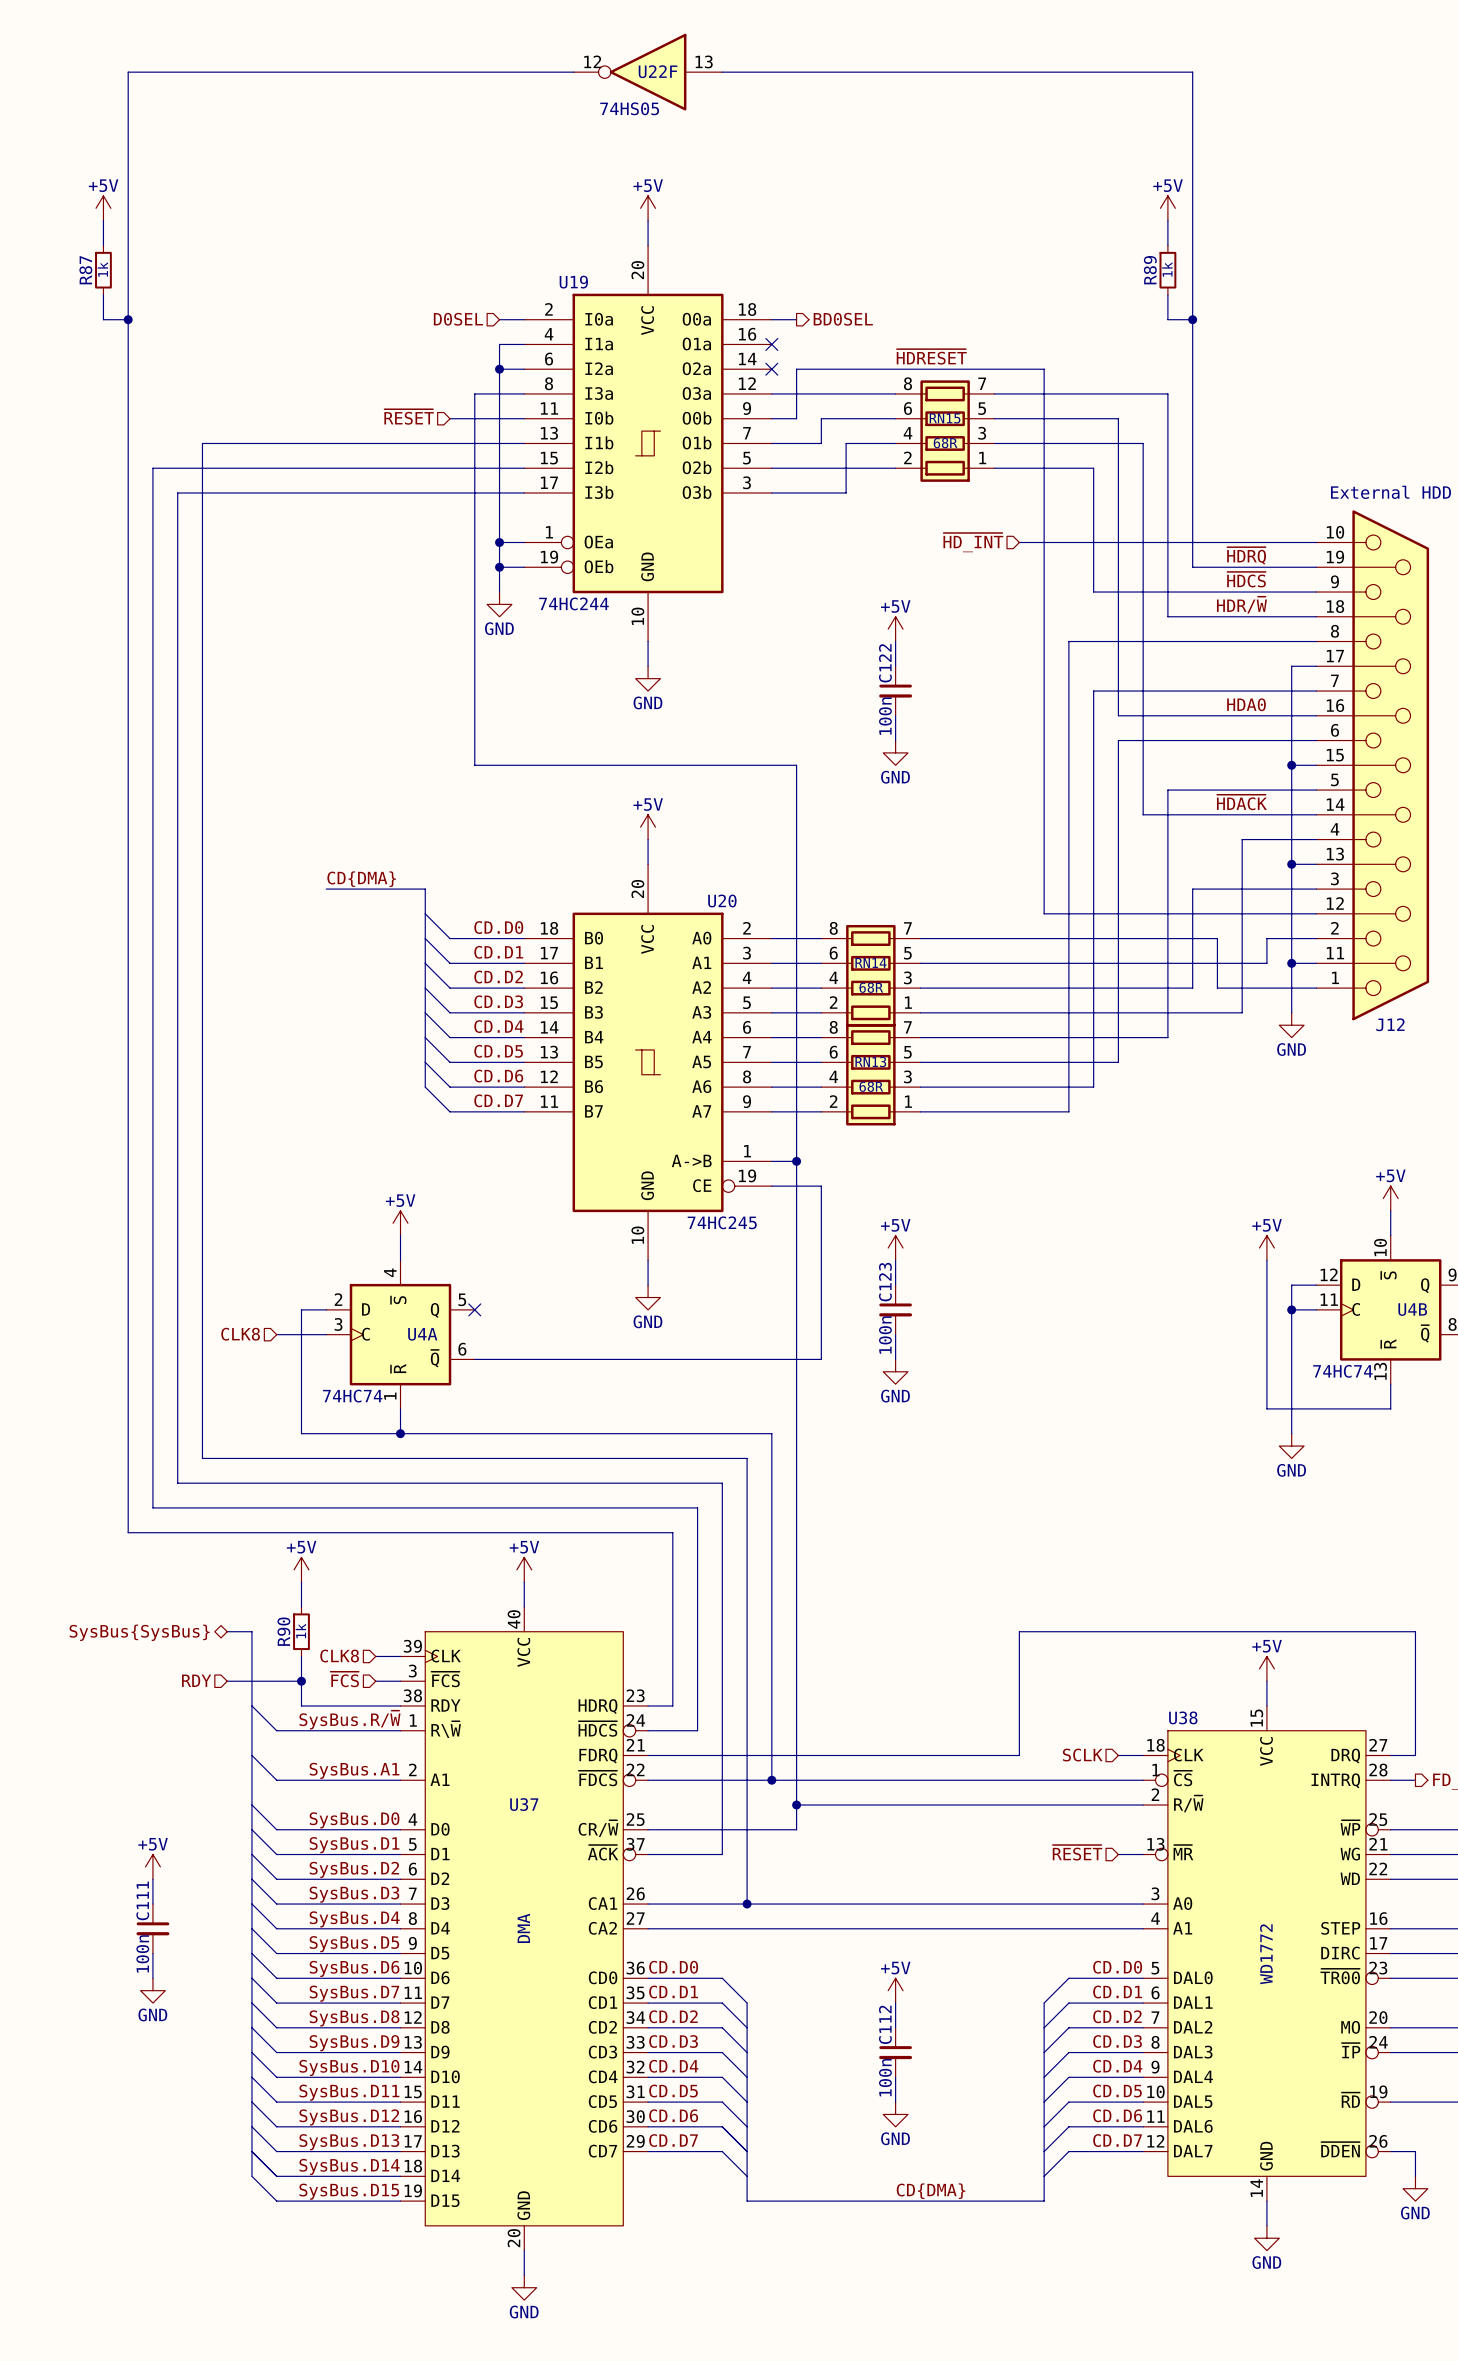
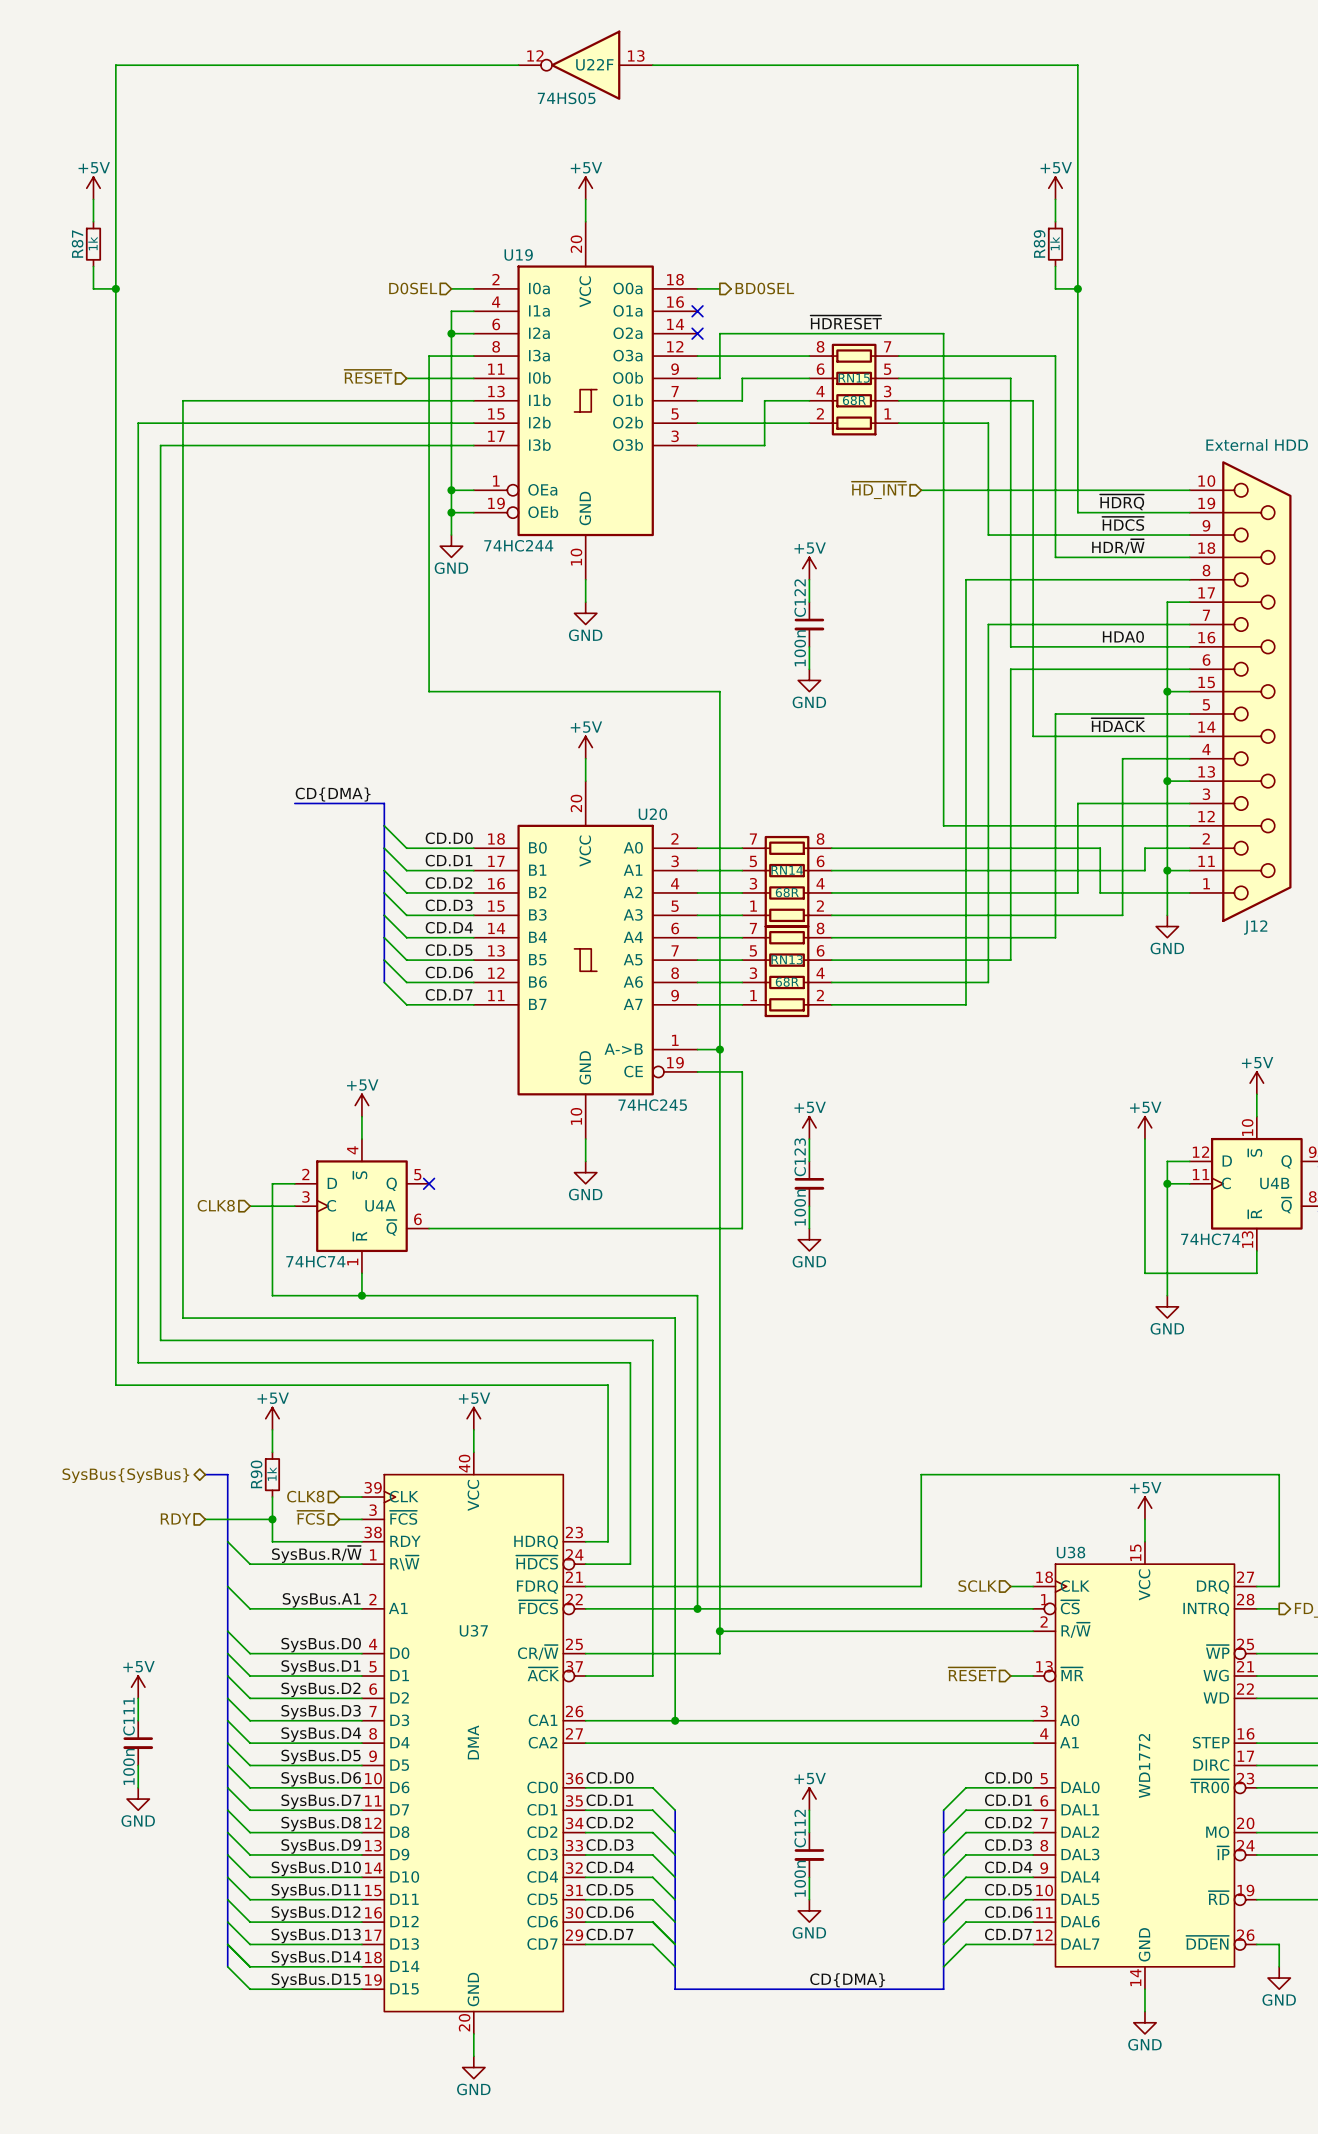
RN14 flip: as is (870, 975) -> left-right (787, 881)
RN13 flip: as is (870, 1074) -> left-right (787, 971)

